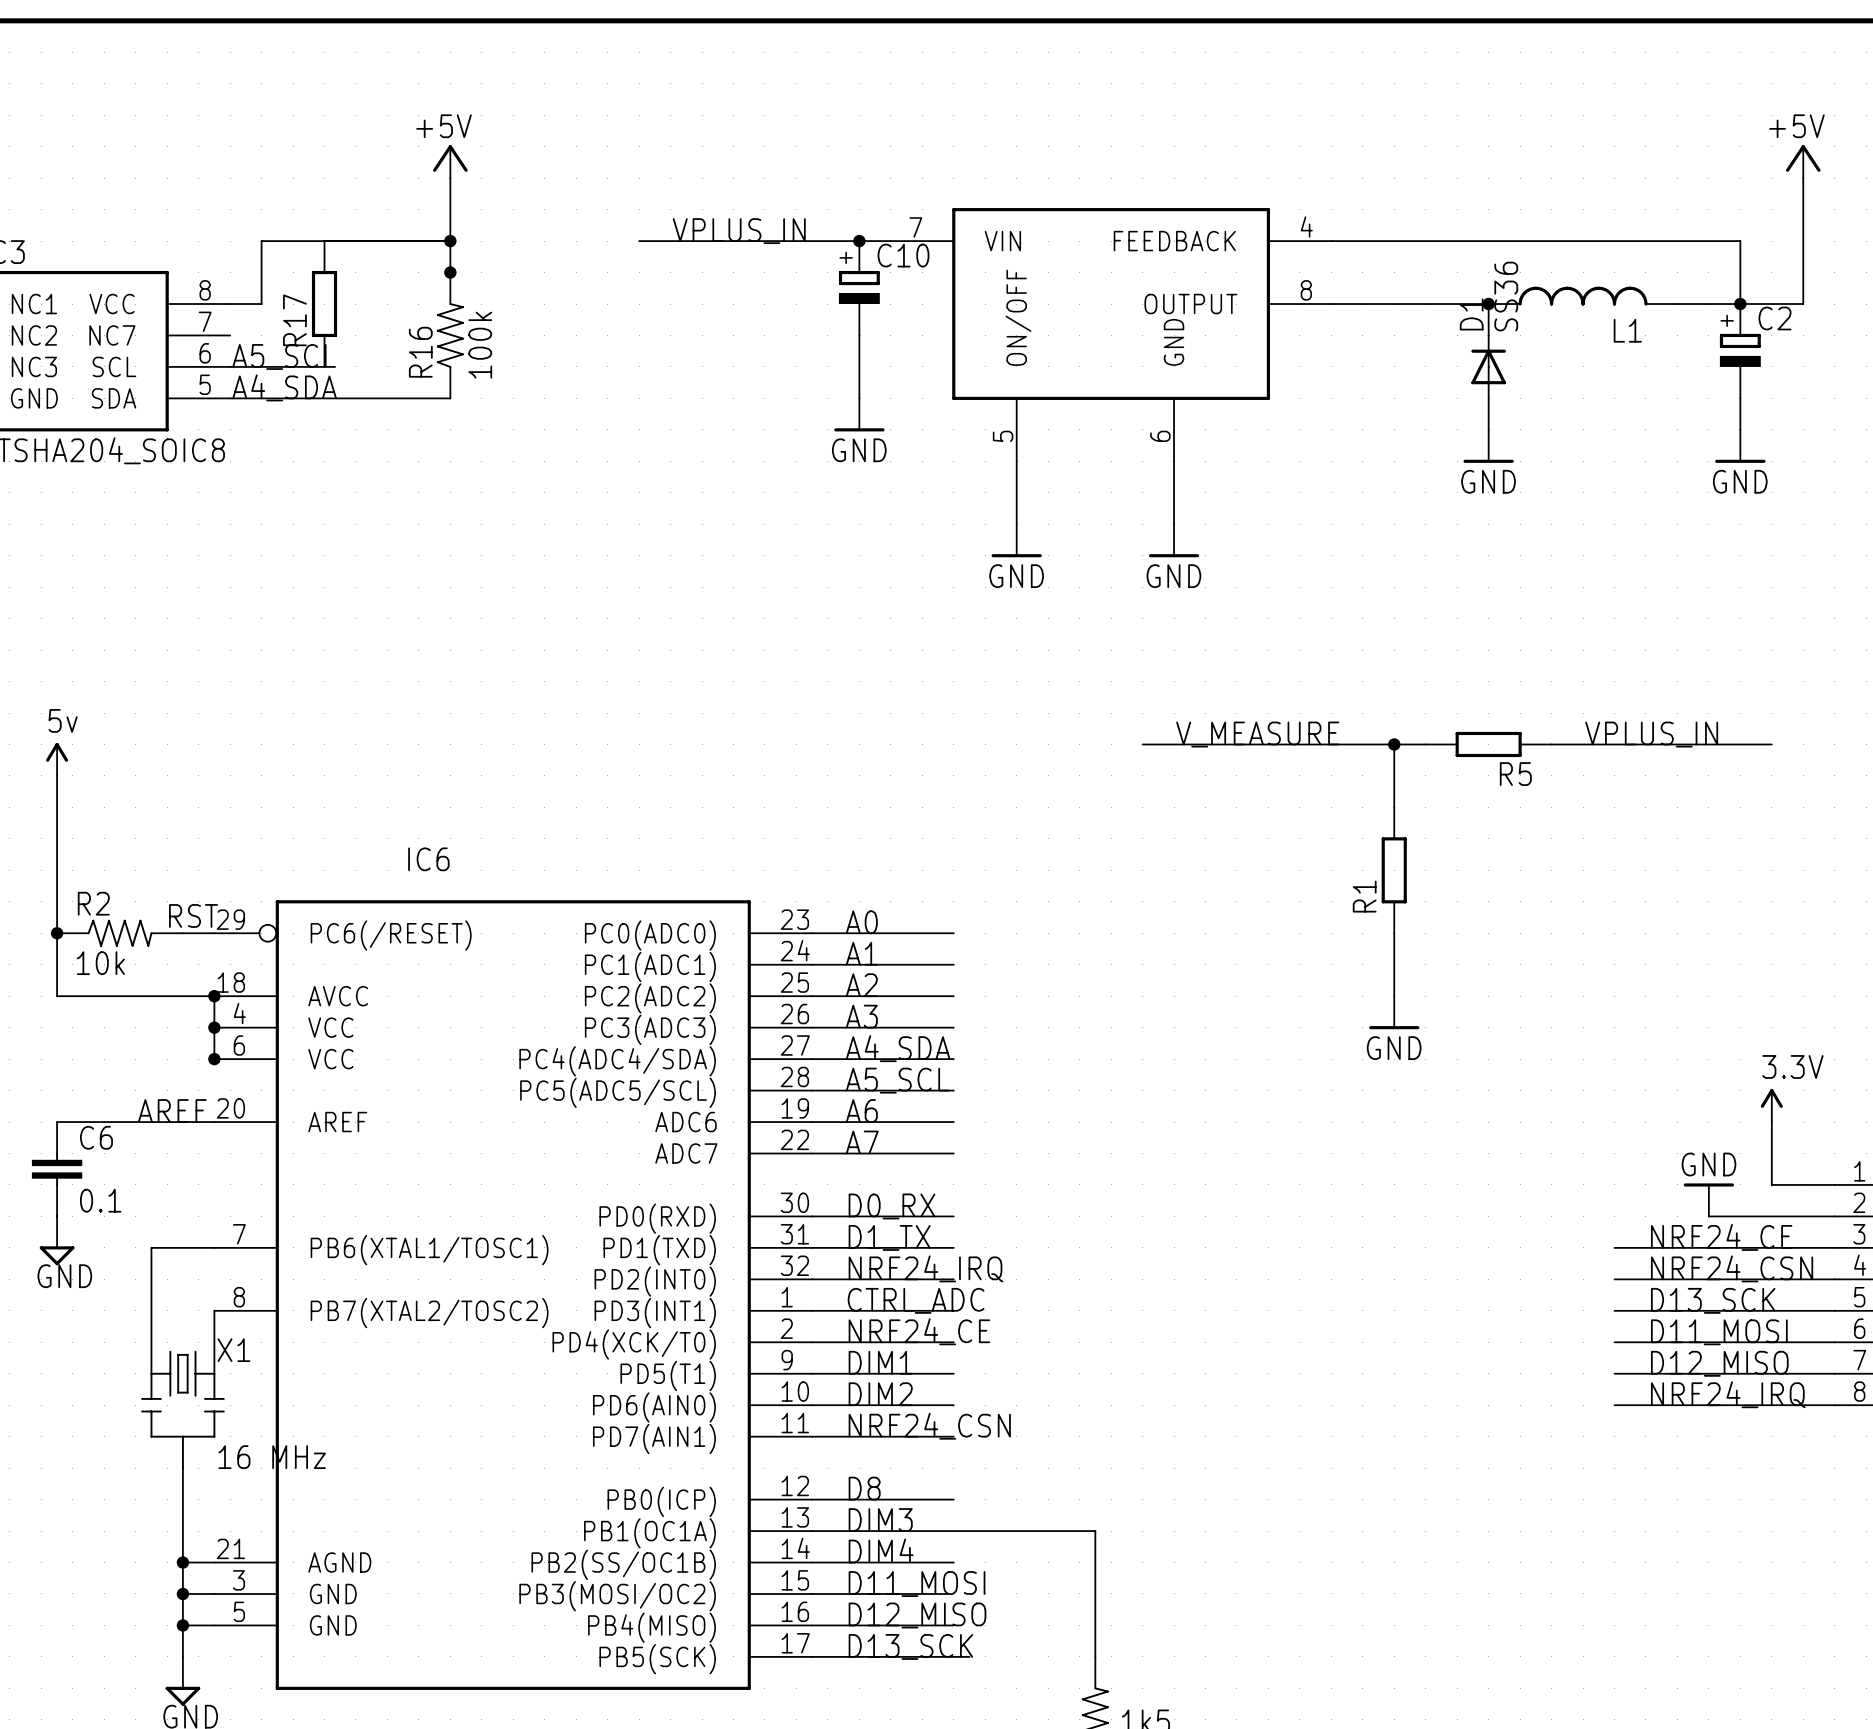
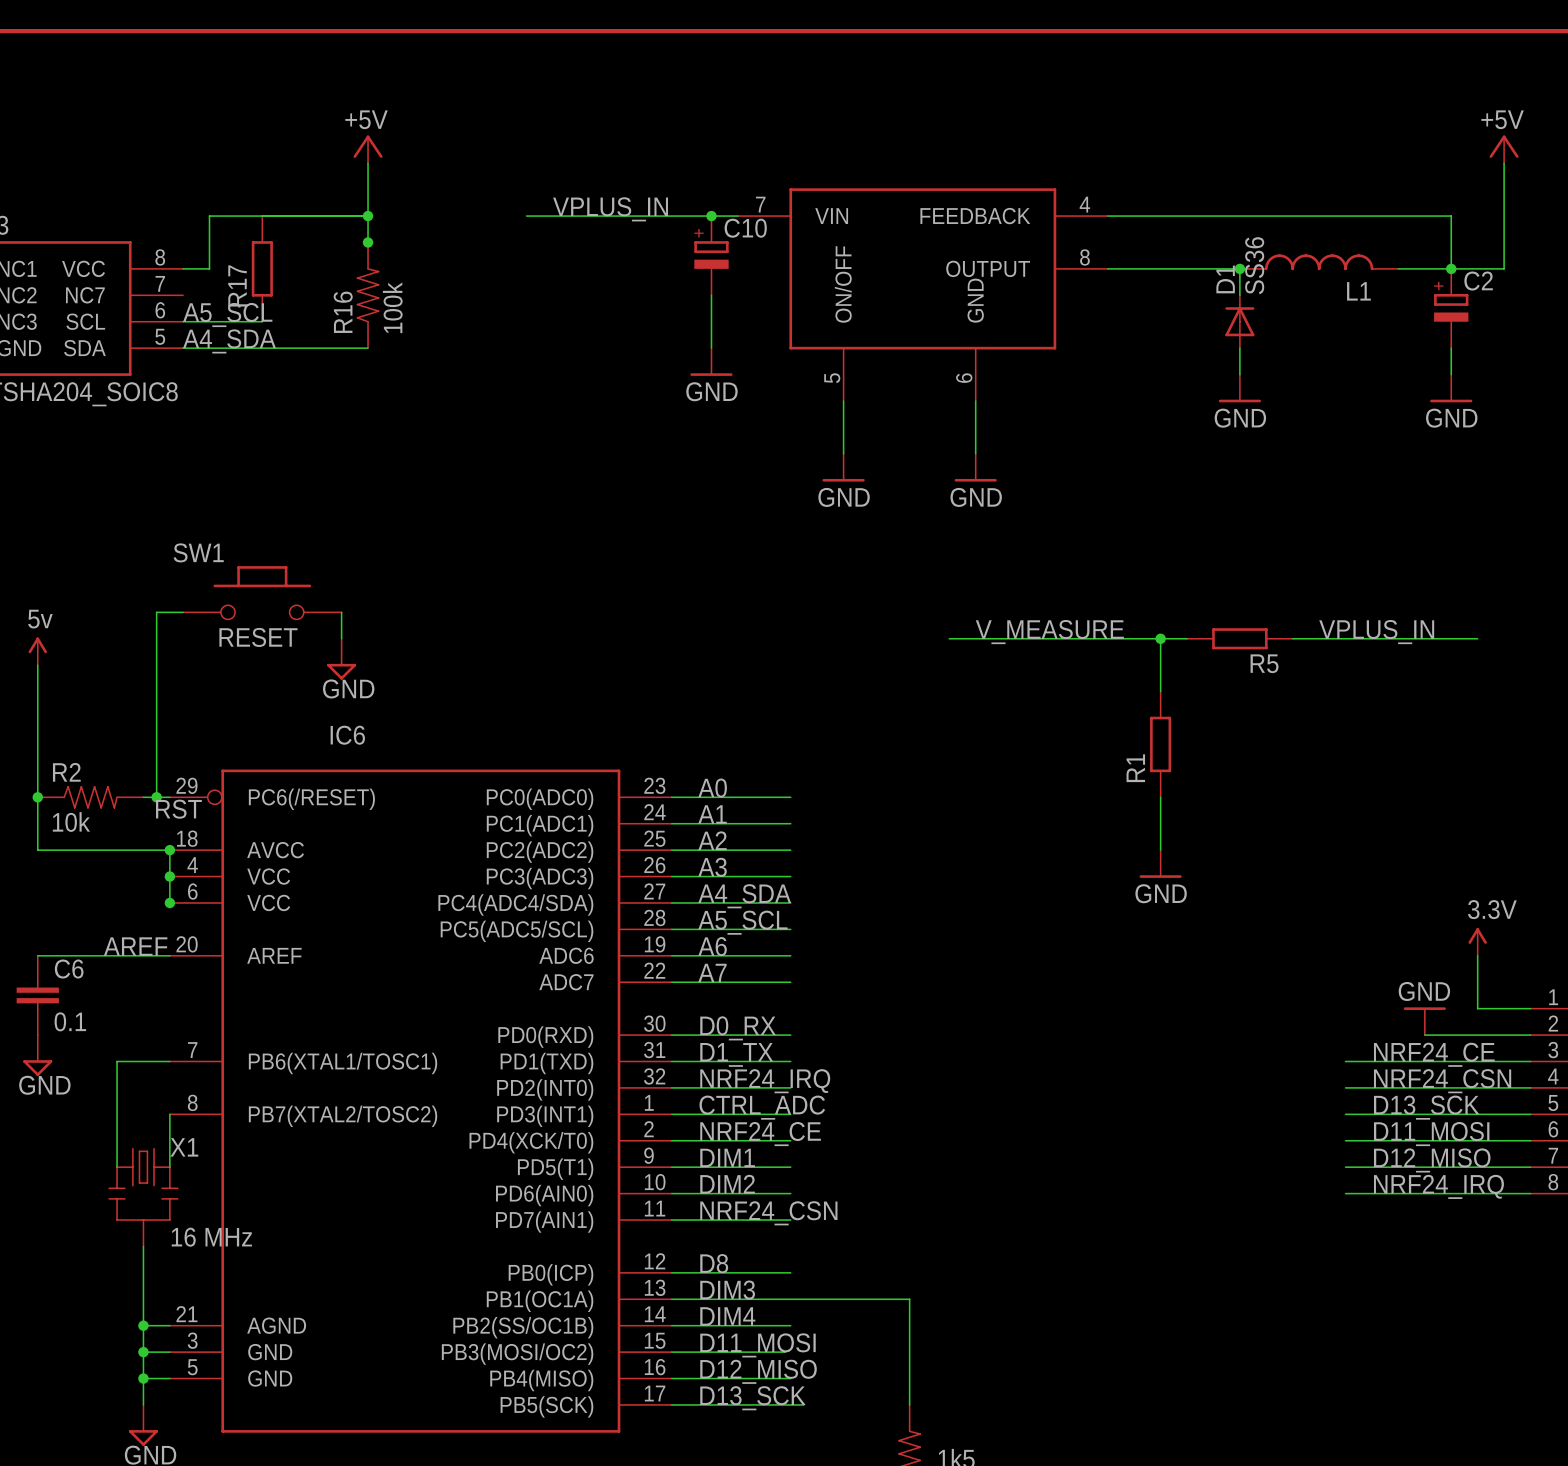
SW1: none -> RESET (262, 592)
wire: none -> (183, 612) (156, 612) (156, 797)
wire: none -> (341, 612) (341, 638)
power symbol: none -> GND (341, 659)
label position: RST (193, 915) -> RST (178, 809)
junction: none -> (156, 797)

